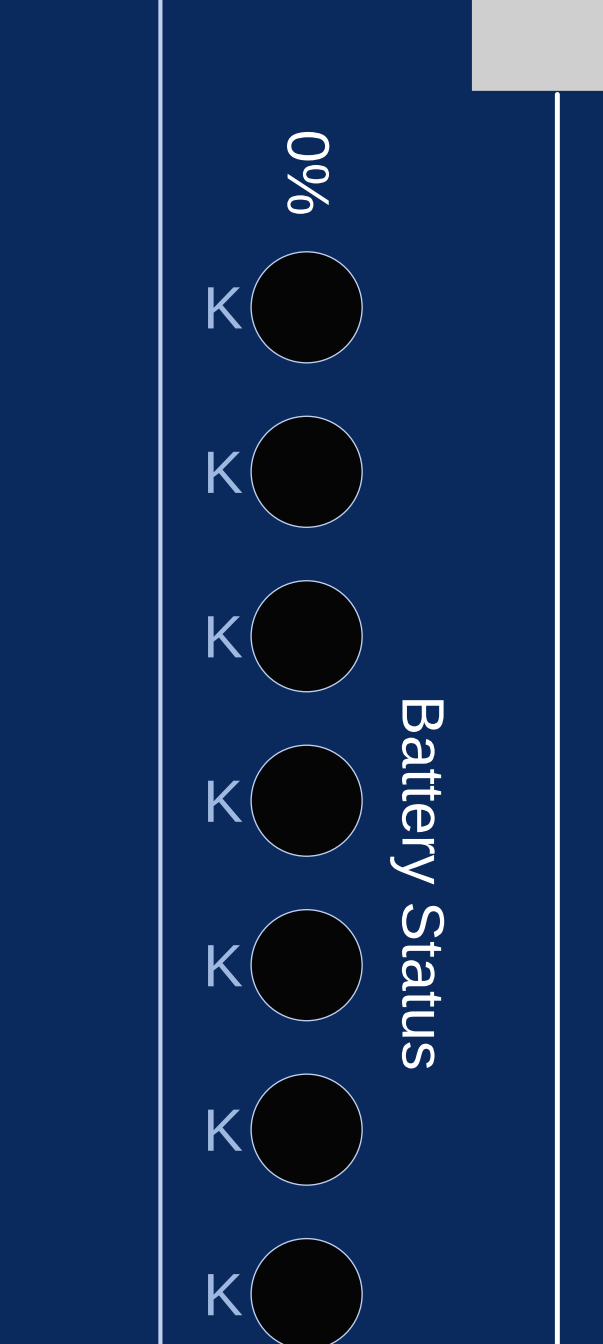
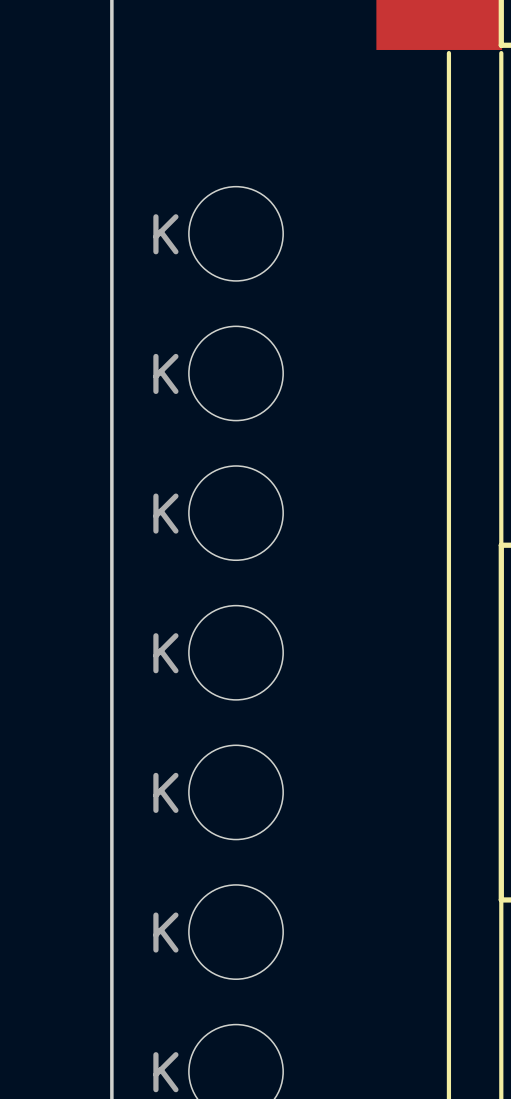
text: 0% (308, 172) -> none
text: Battery Status (417, 884) -> none

